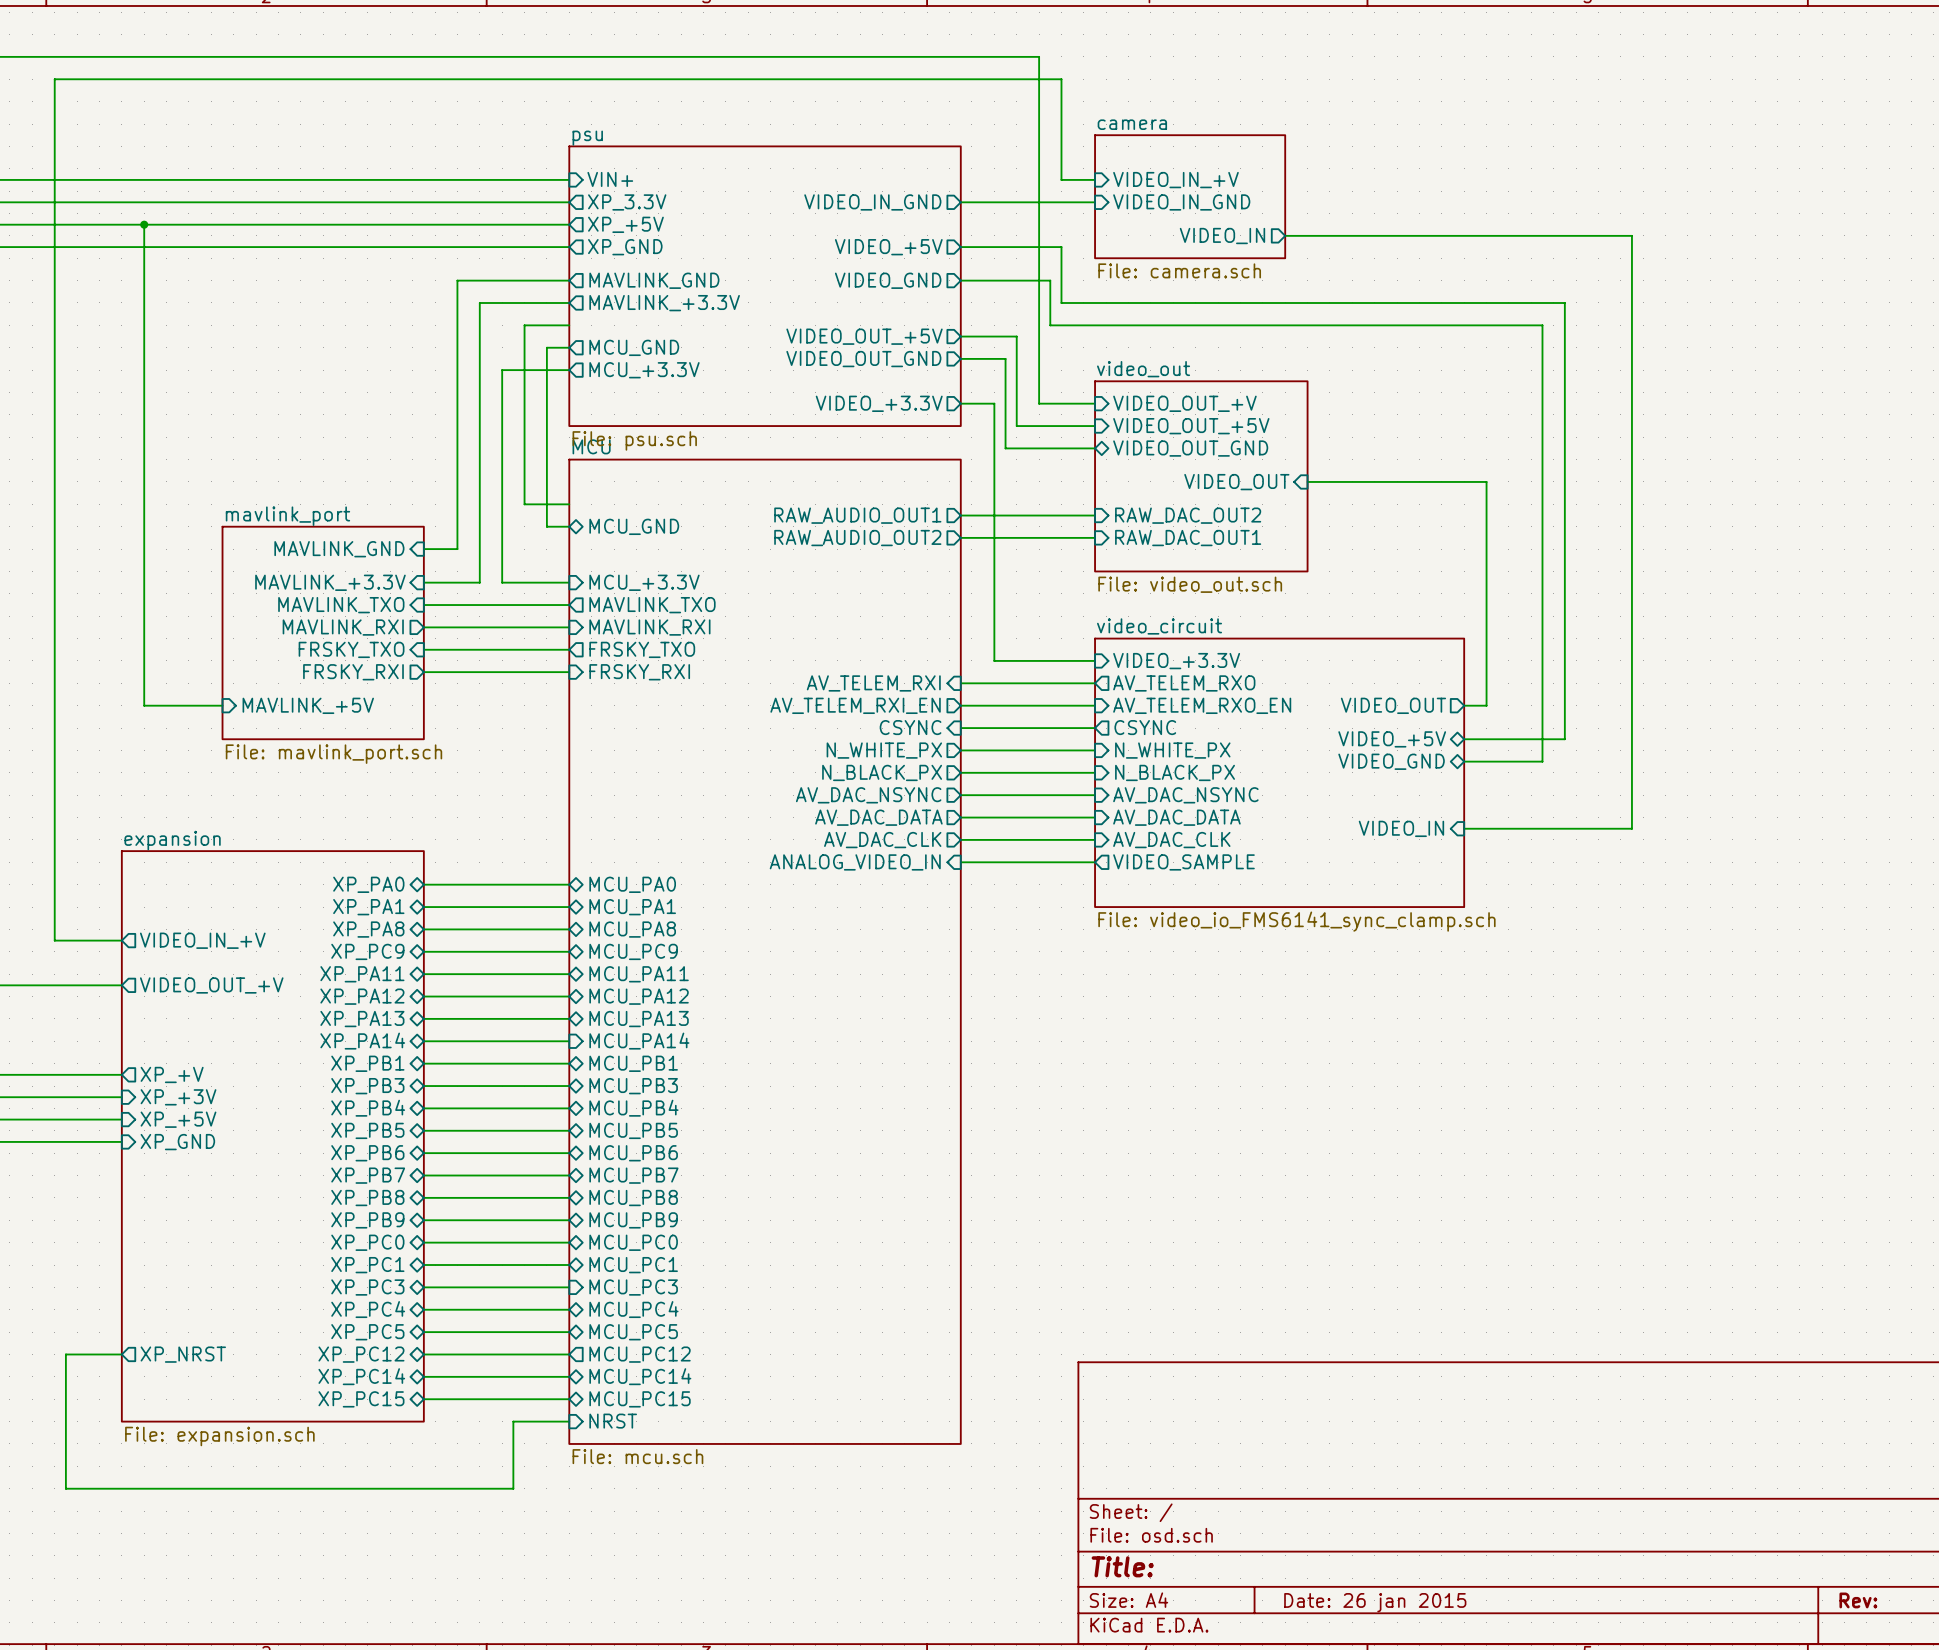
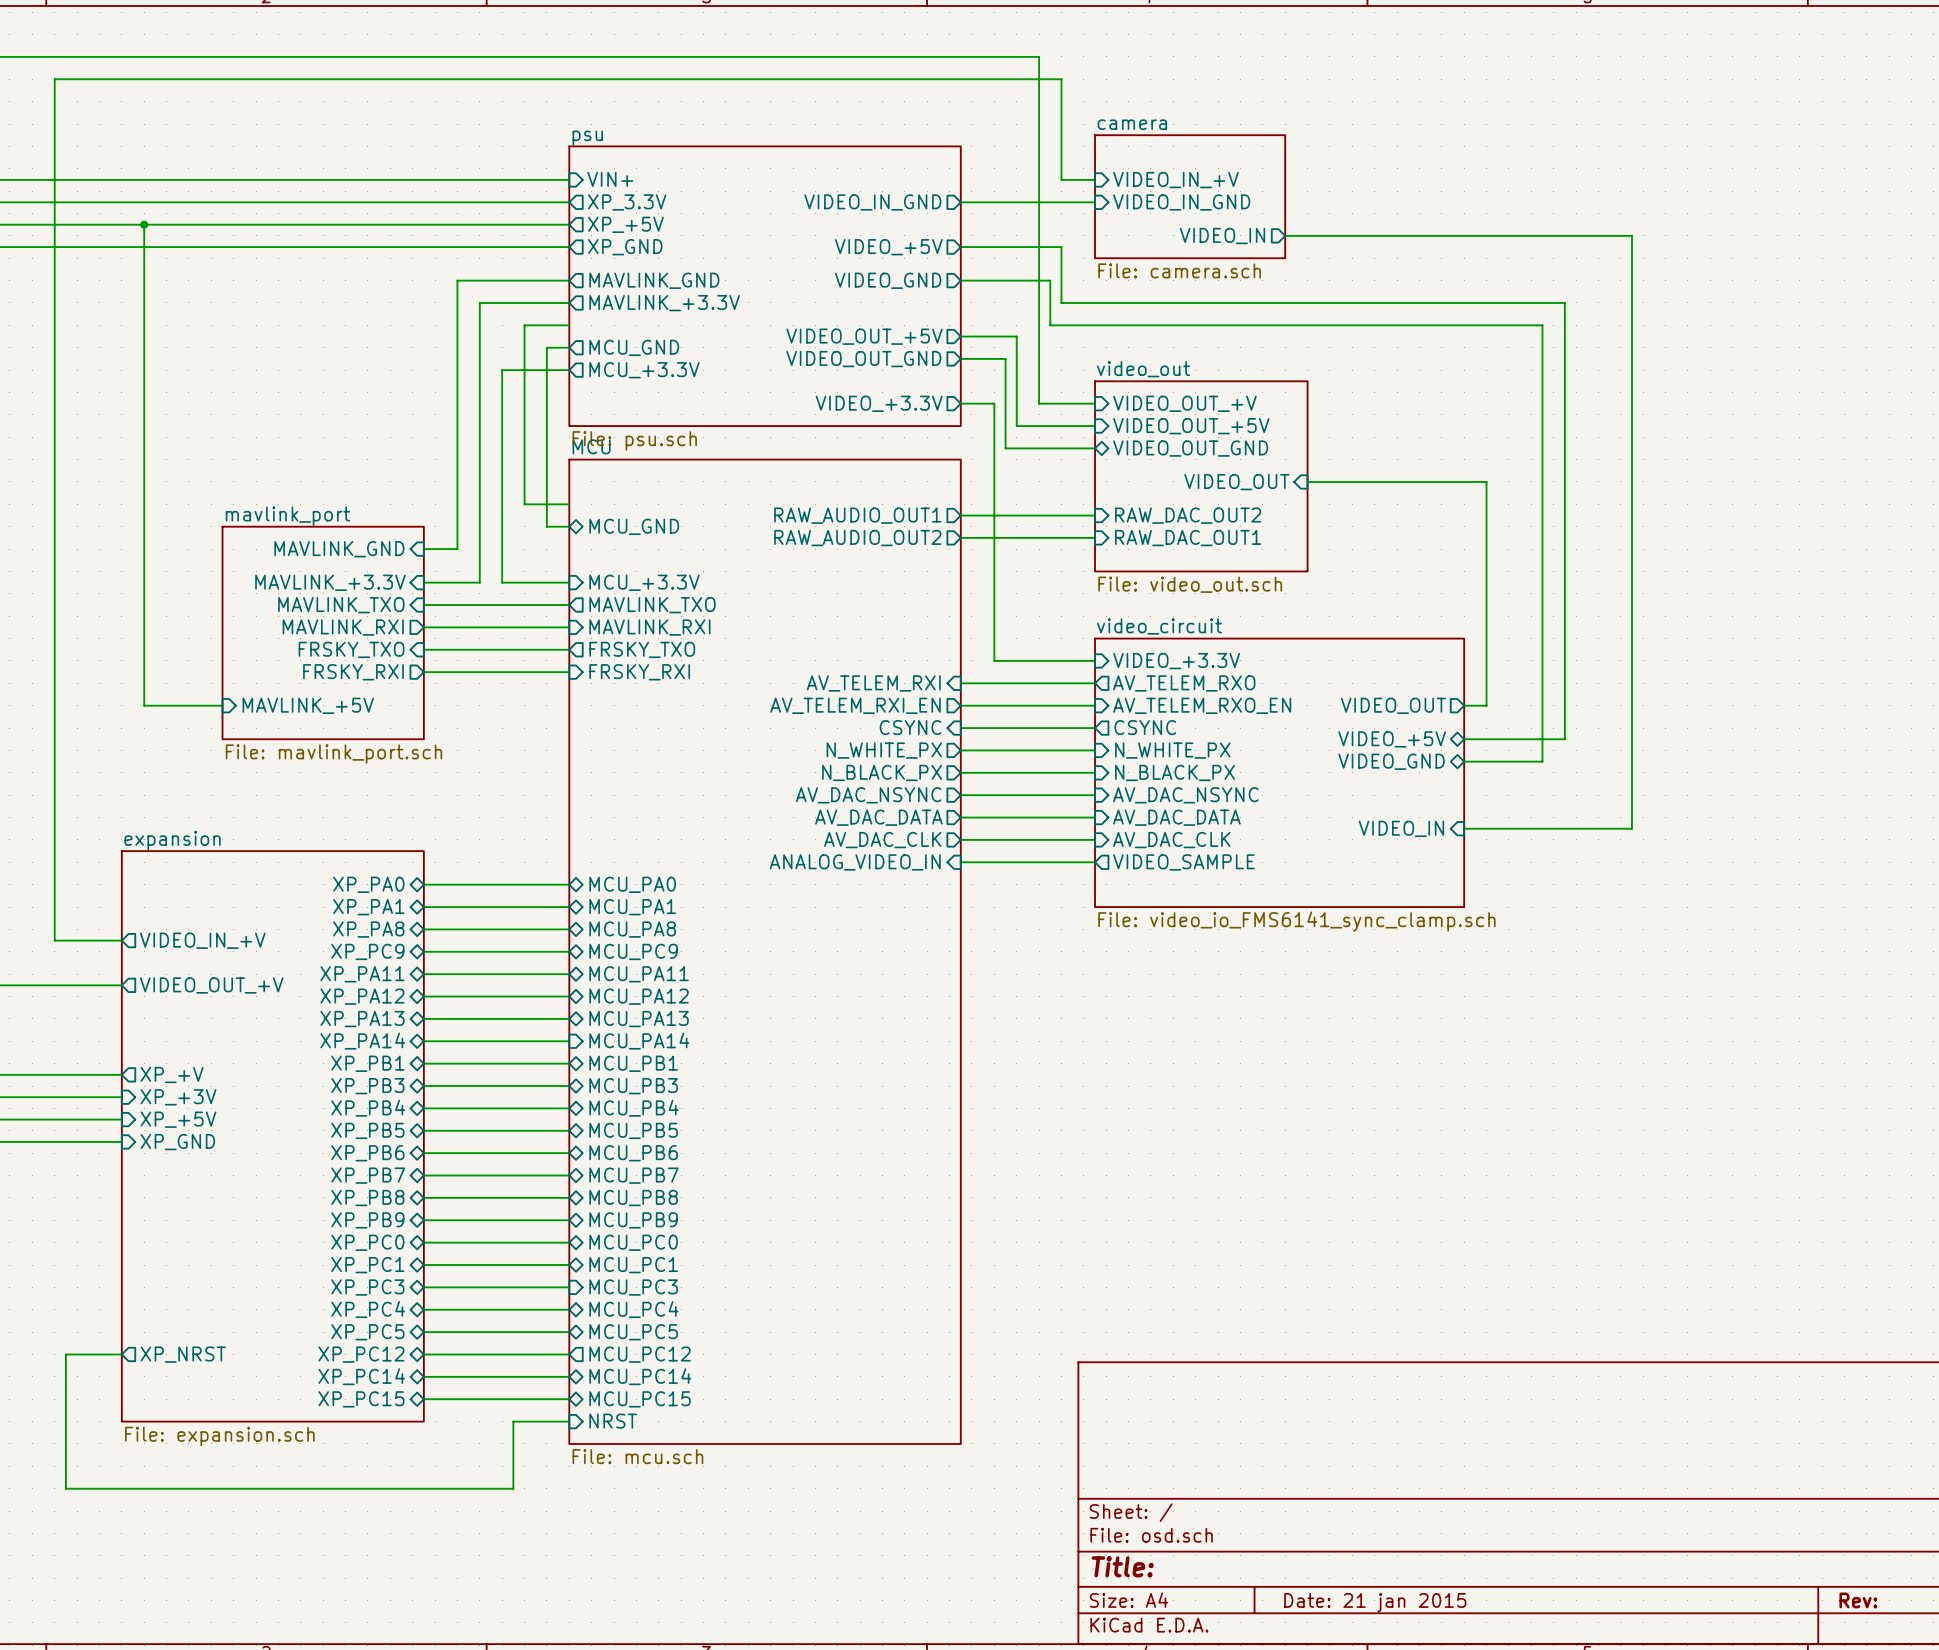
title block: Date: 26 jan 2015 (1375, 1602) -> Date: 21 jan 2015 (1375, 1602)

